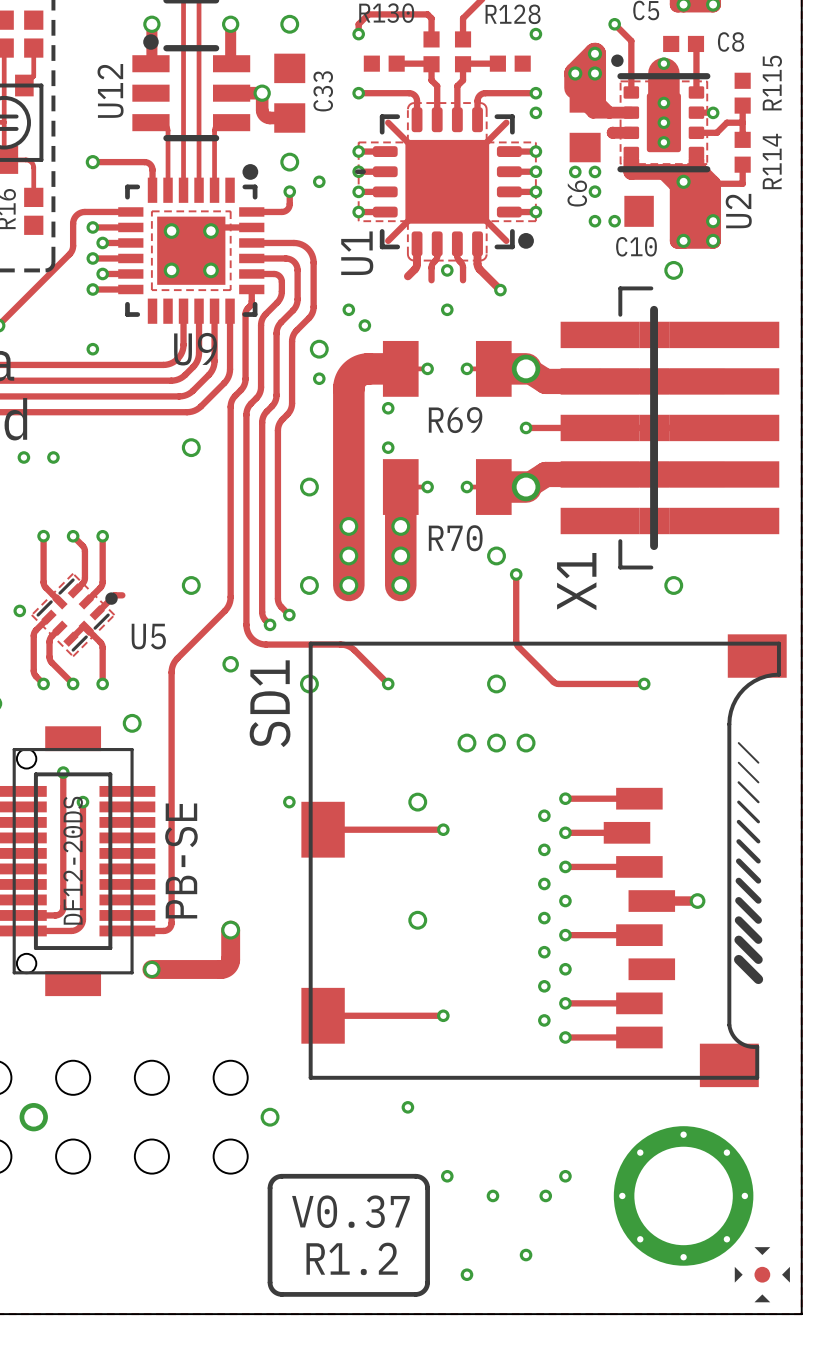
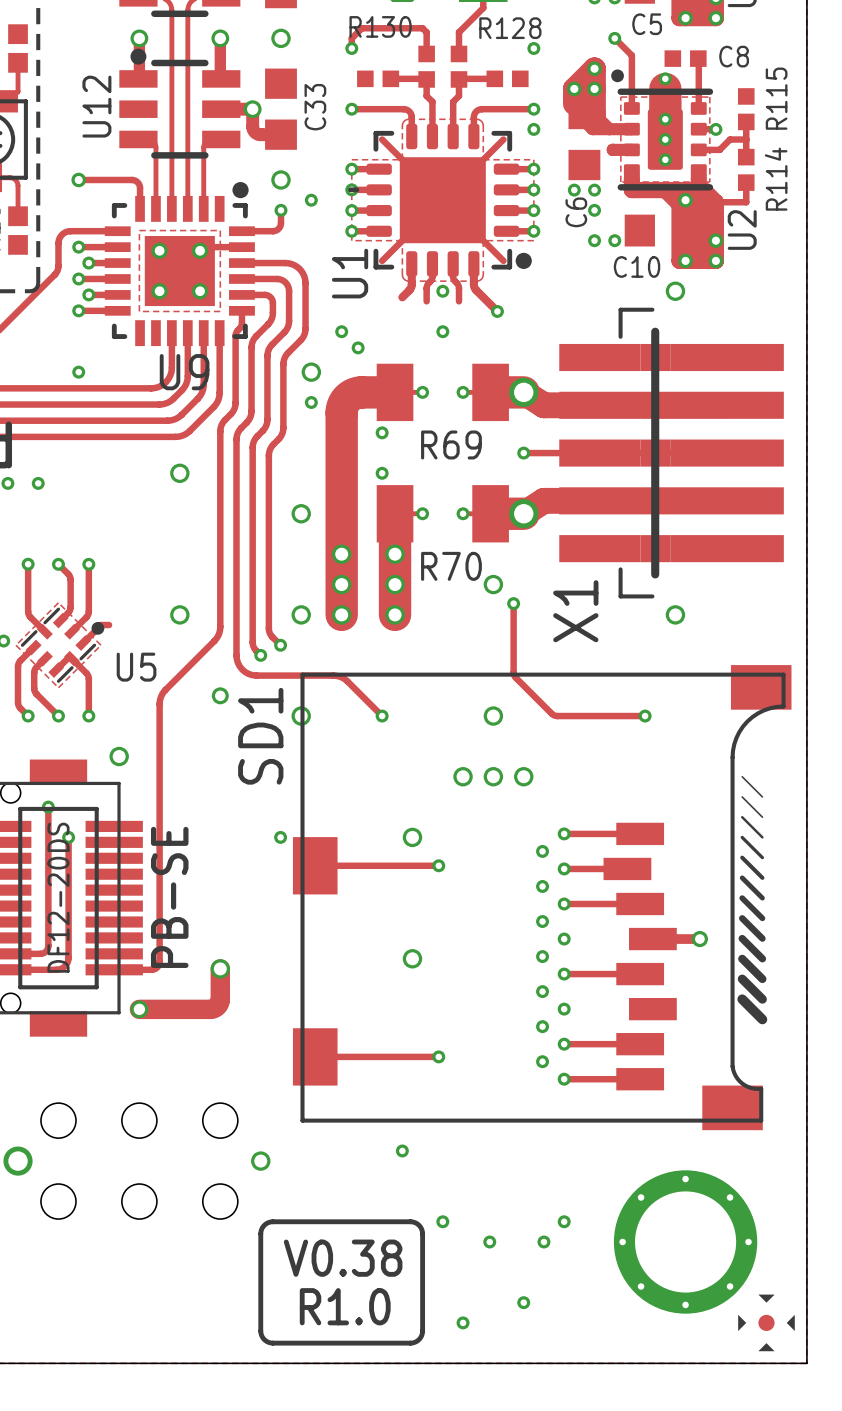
text: V0.37 (350, 1211) -> V0.38 (343, 1258)
text: R1.2 (352, 1258) -> R1.0 (345, 1306)

